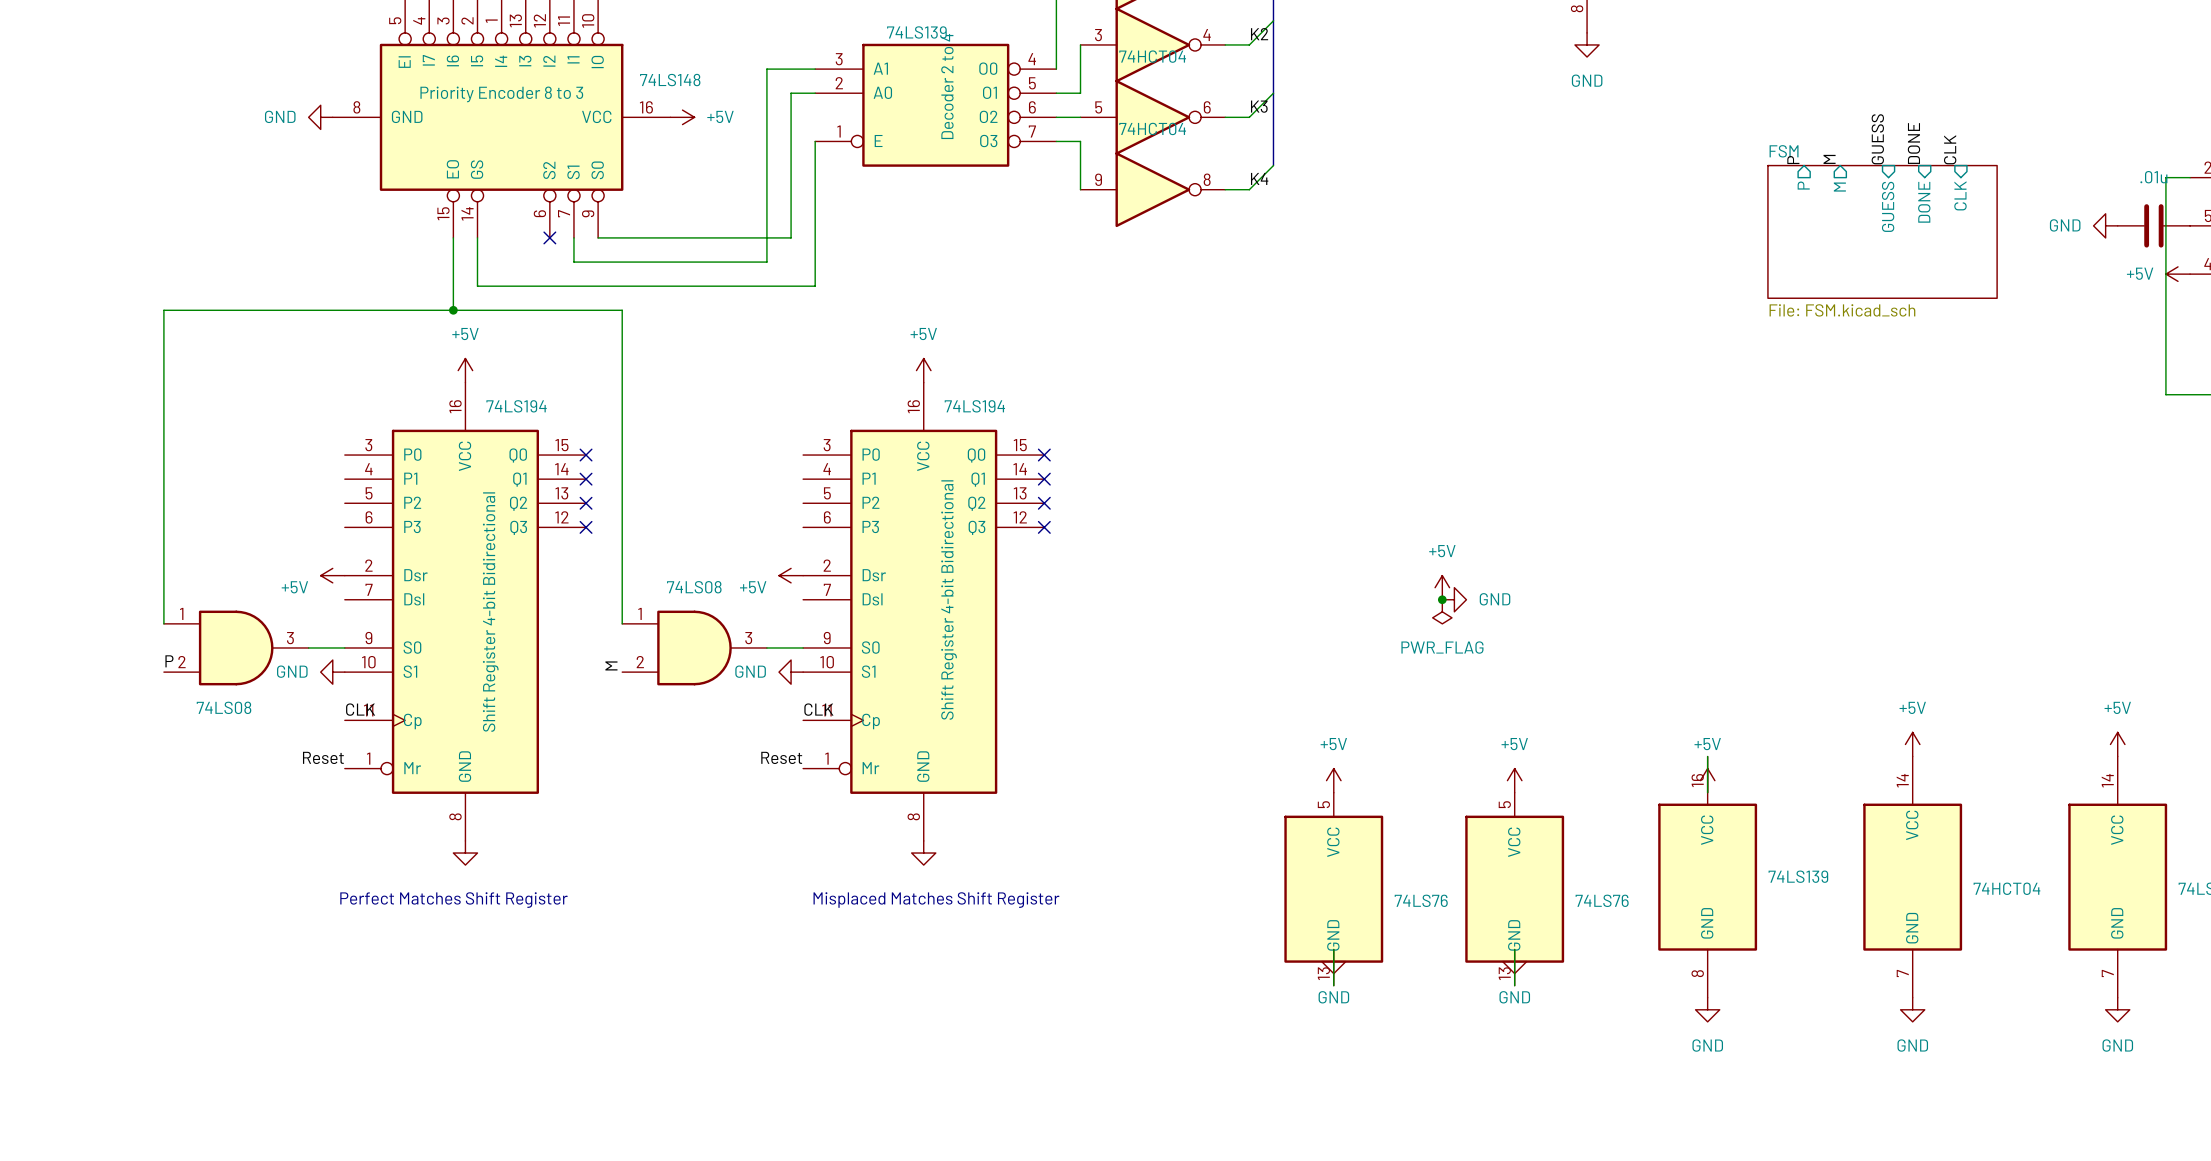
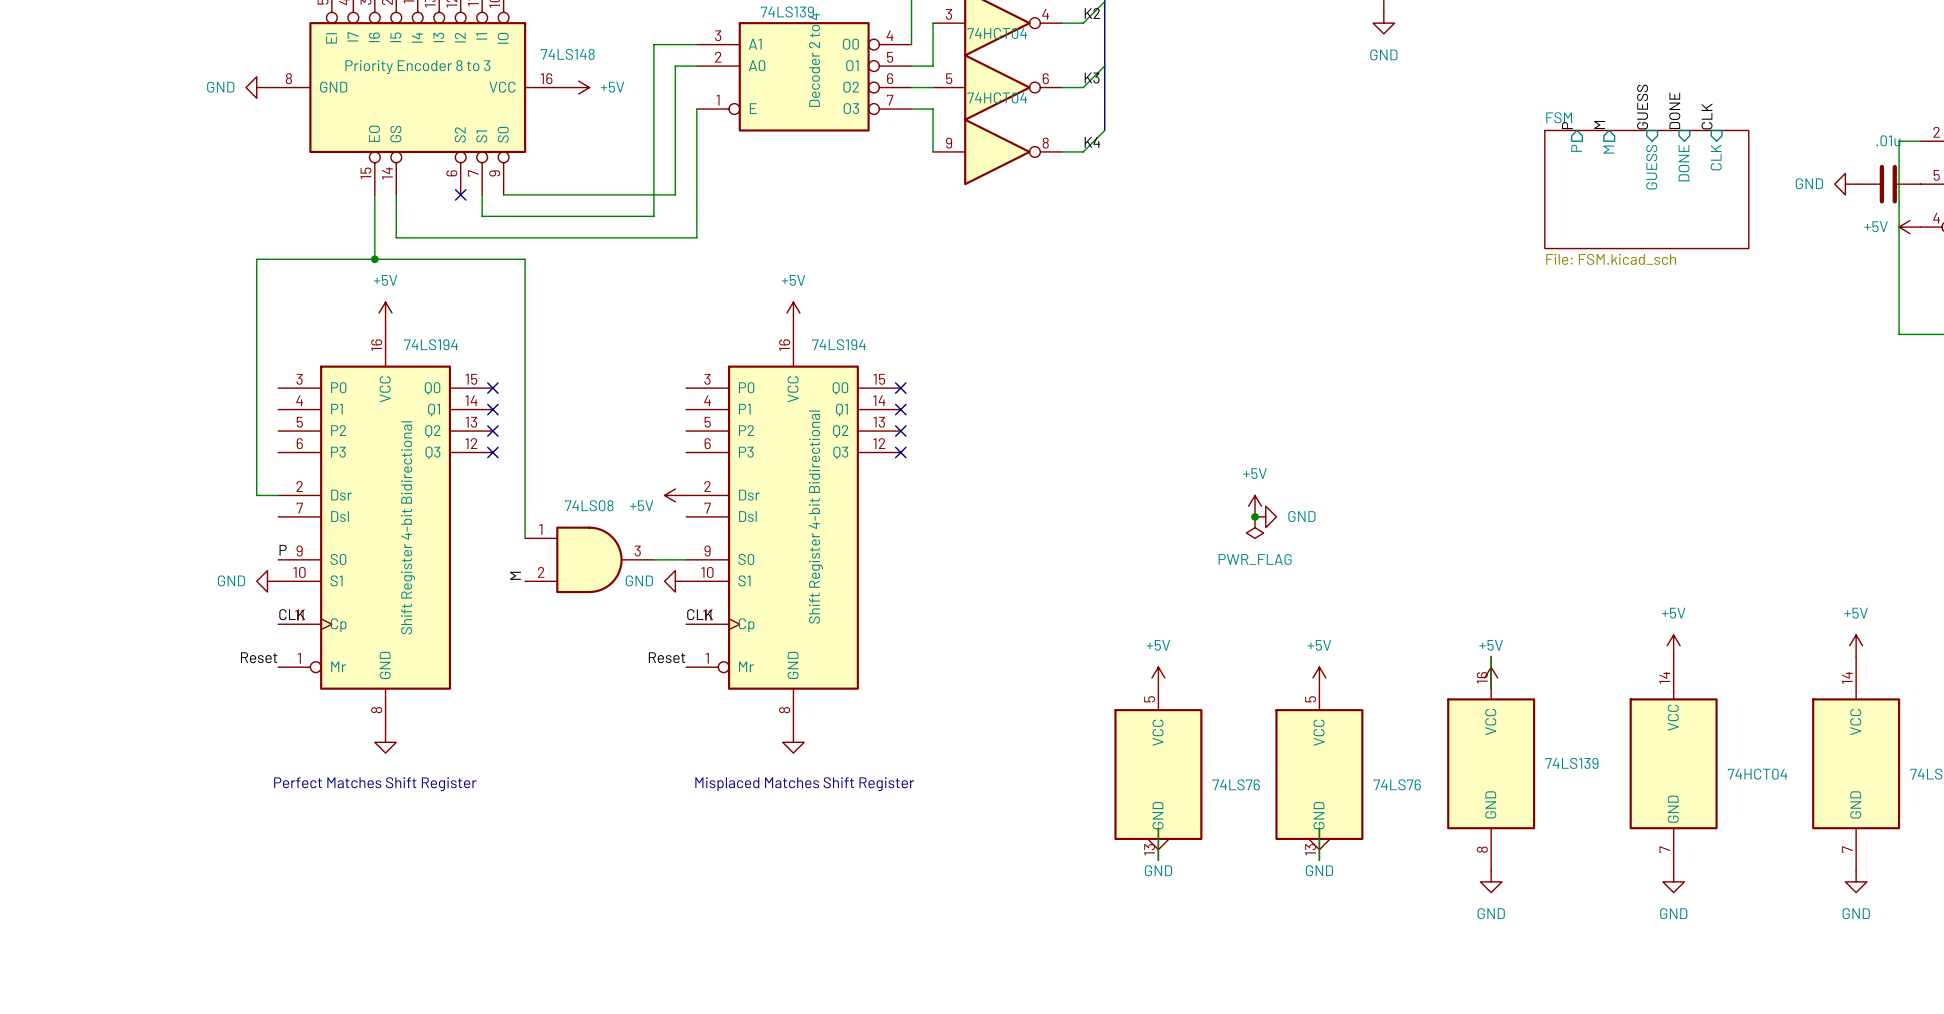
wire: (320, 310) (163, 310) (163, 623) -> (256, 259) (256, 495) (278, 495)
power symbol: +5V (332, 575) -> none
part: 74LS08 (236, 647) -> none
wire: (308, 647) (344, 647) -> none
label position: P (169, 661) -> P (283, 550)

